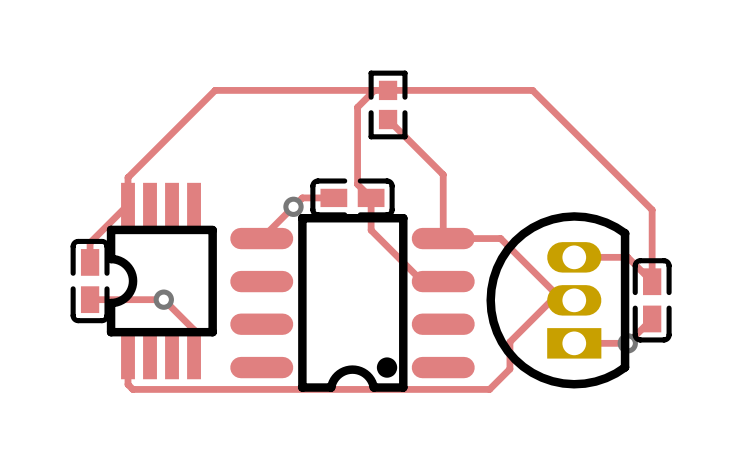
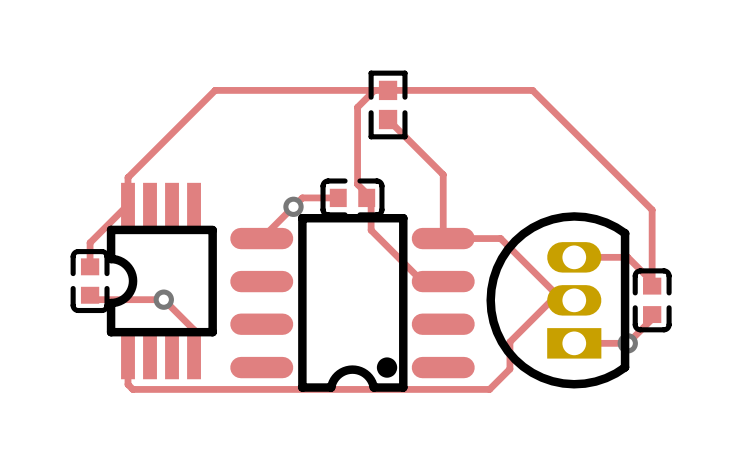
part footprint: [310, 178, 395, 218] -> [320, 178, 385, 218]
part footprint: [70, 238, 110, 324] -> [70, 249, 110, 314]
part footprint: [632, 258, 672, 343] -> [632, 268, 672, 333]

